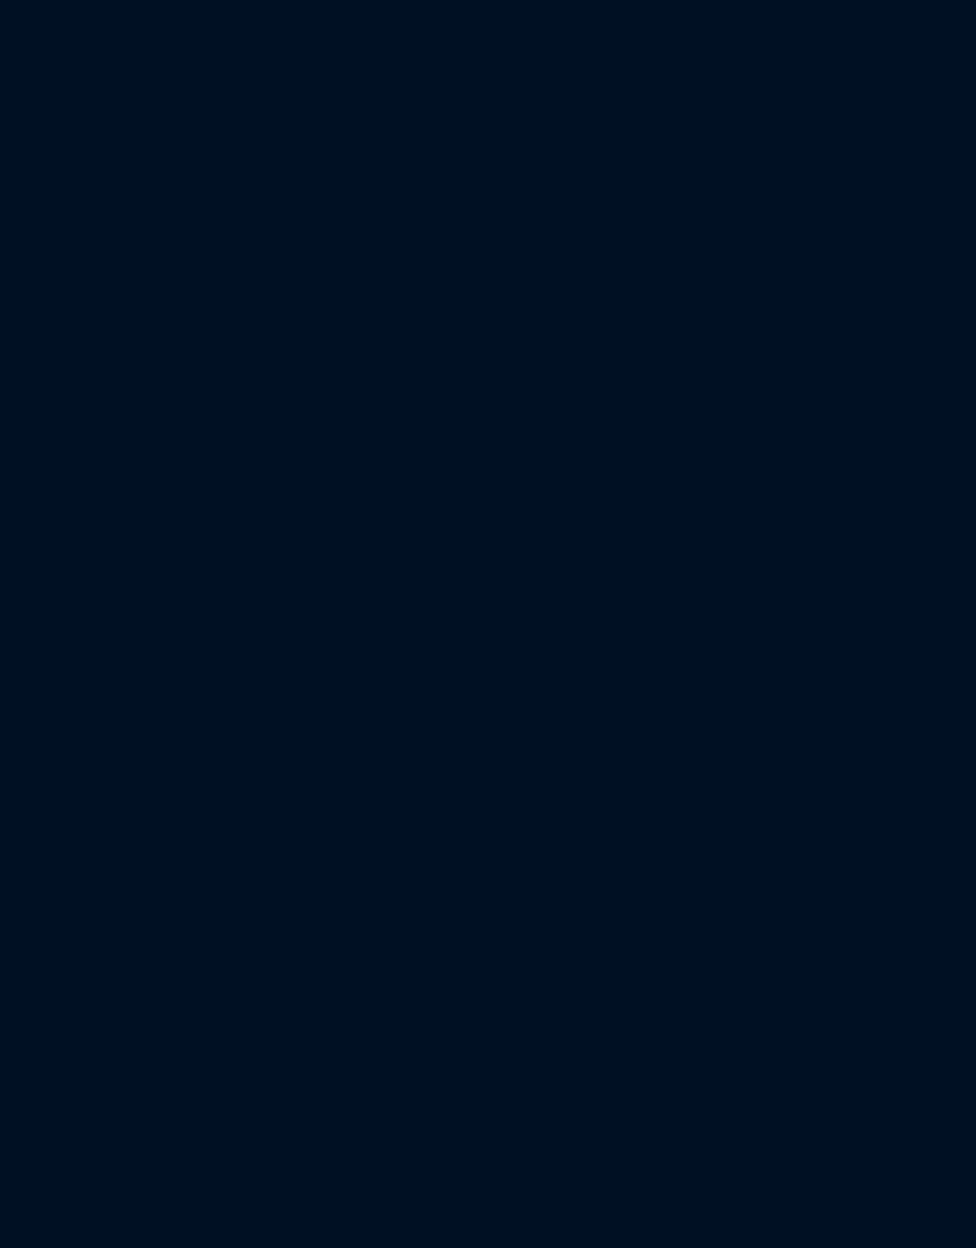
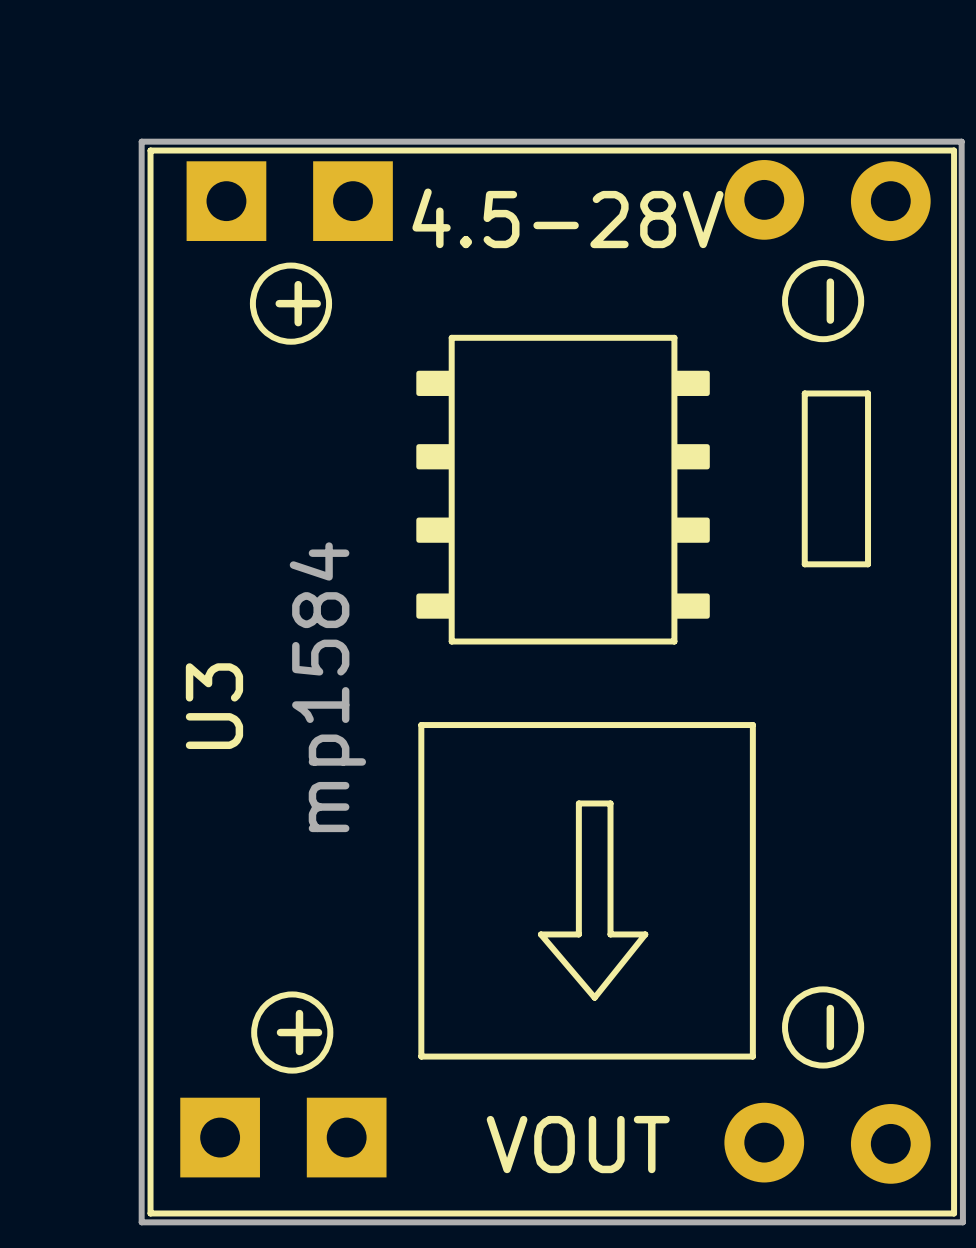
U3: none -> mp1584 (552, 682)

